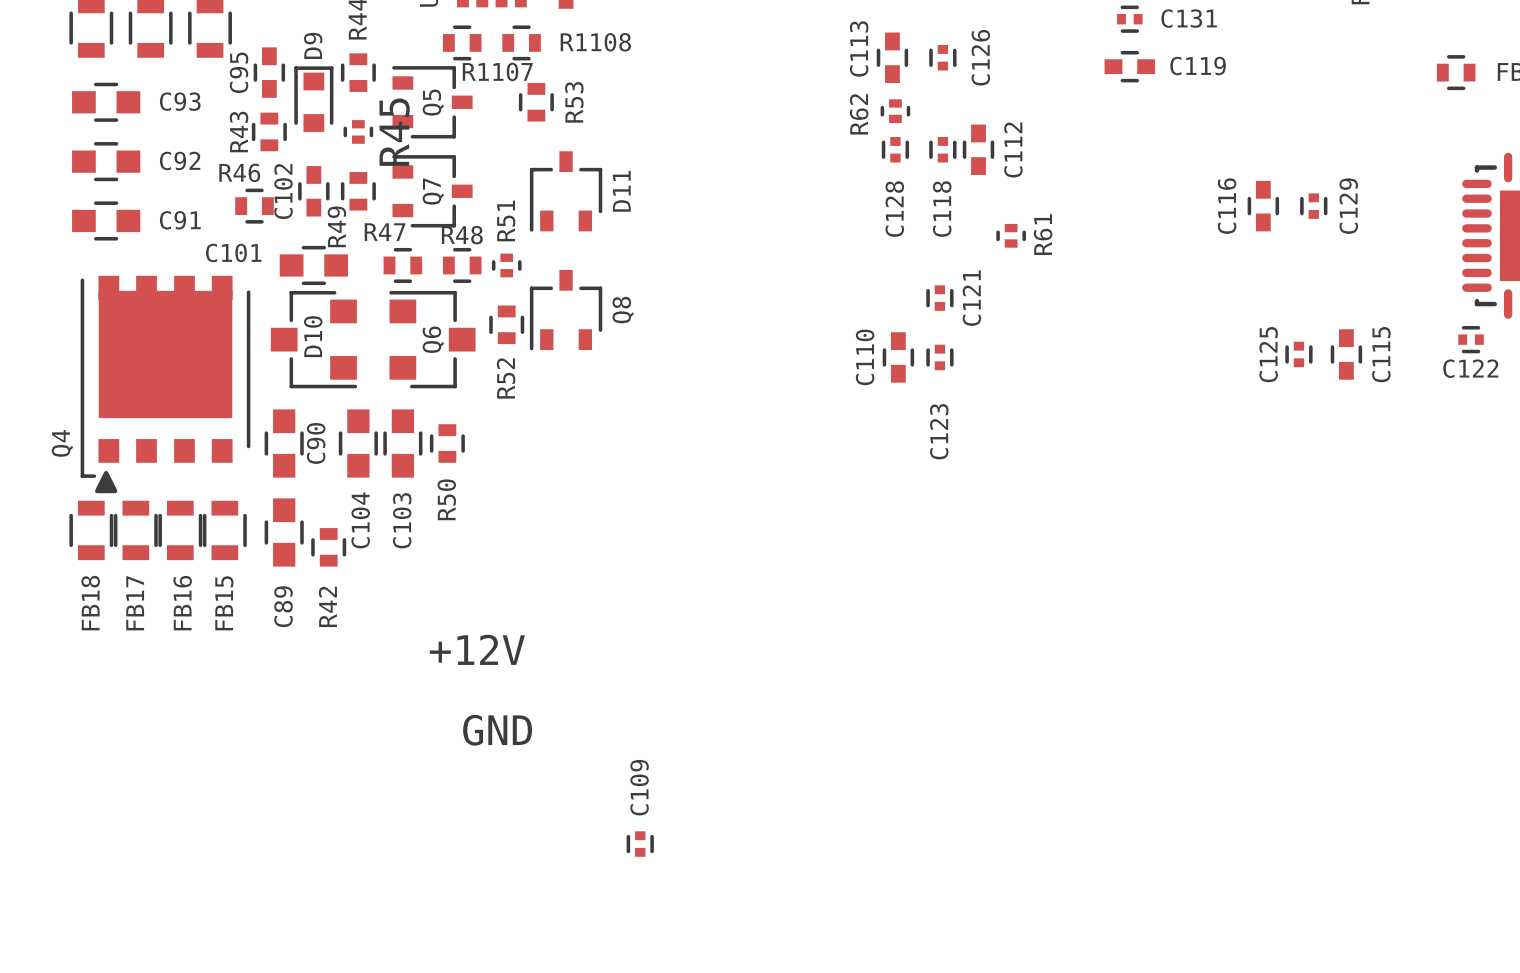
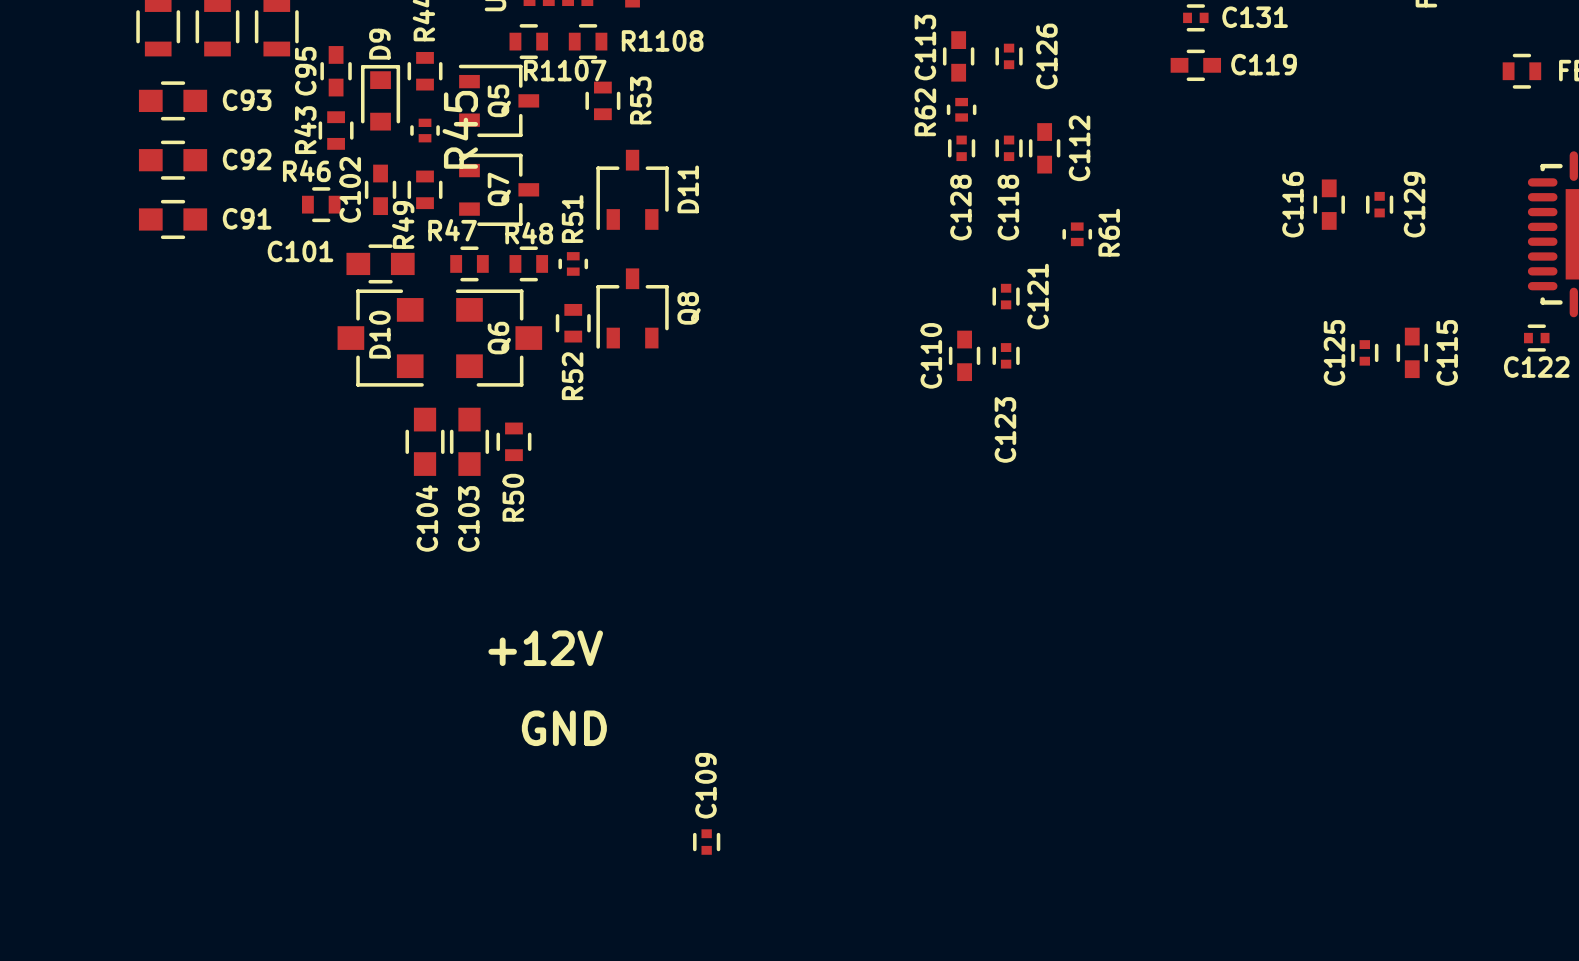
Q4: (165, 376) -> none
C90: (284, 443) -> none
drawing: [95, 470, 118, 494] -> none
FB18: (91, 530) -> none
FB17: (135, 530) -> none
FB16: (180, 530) -> none
FB15: (224, 530) -> none
C89: (284, 532) -> none
R42: (328, 547) -> none

